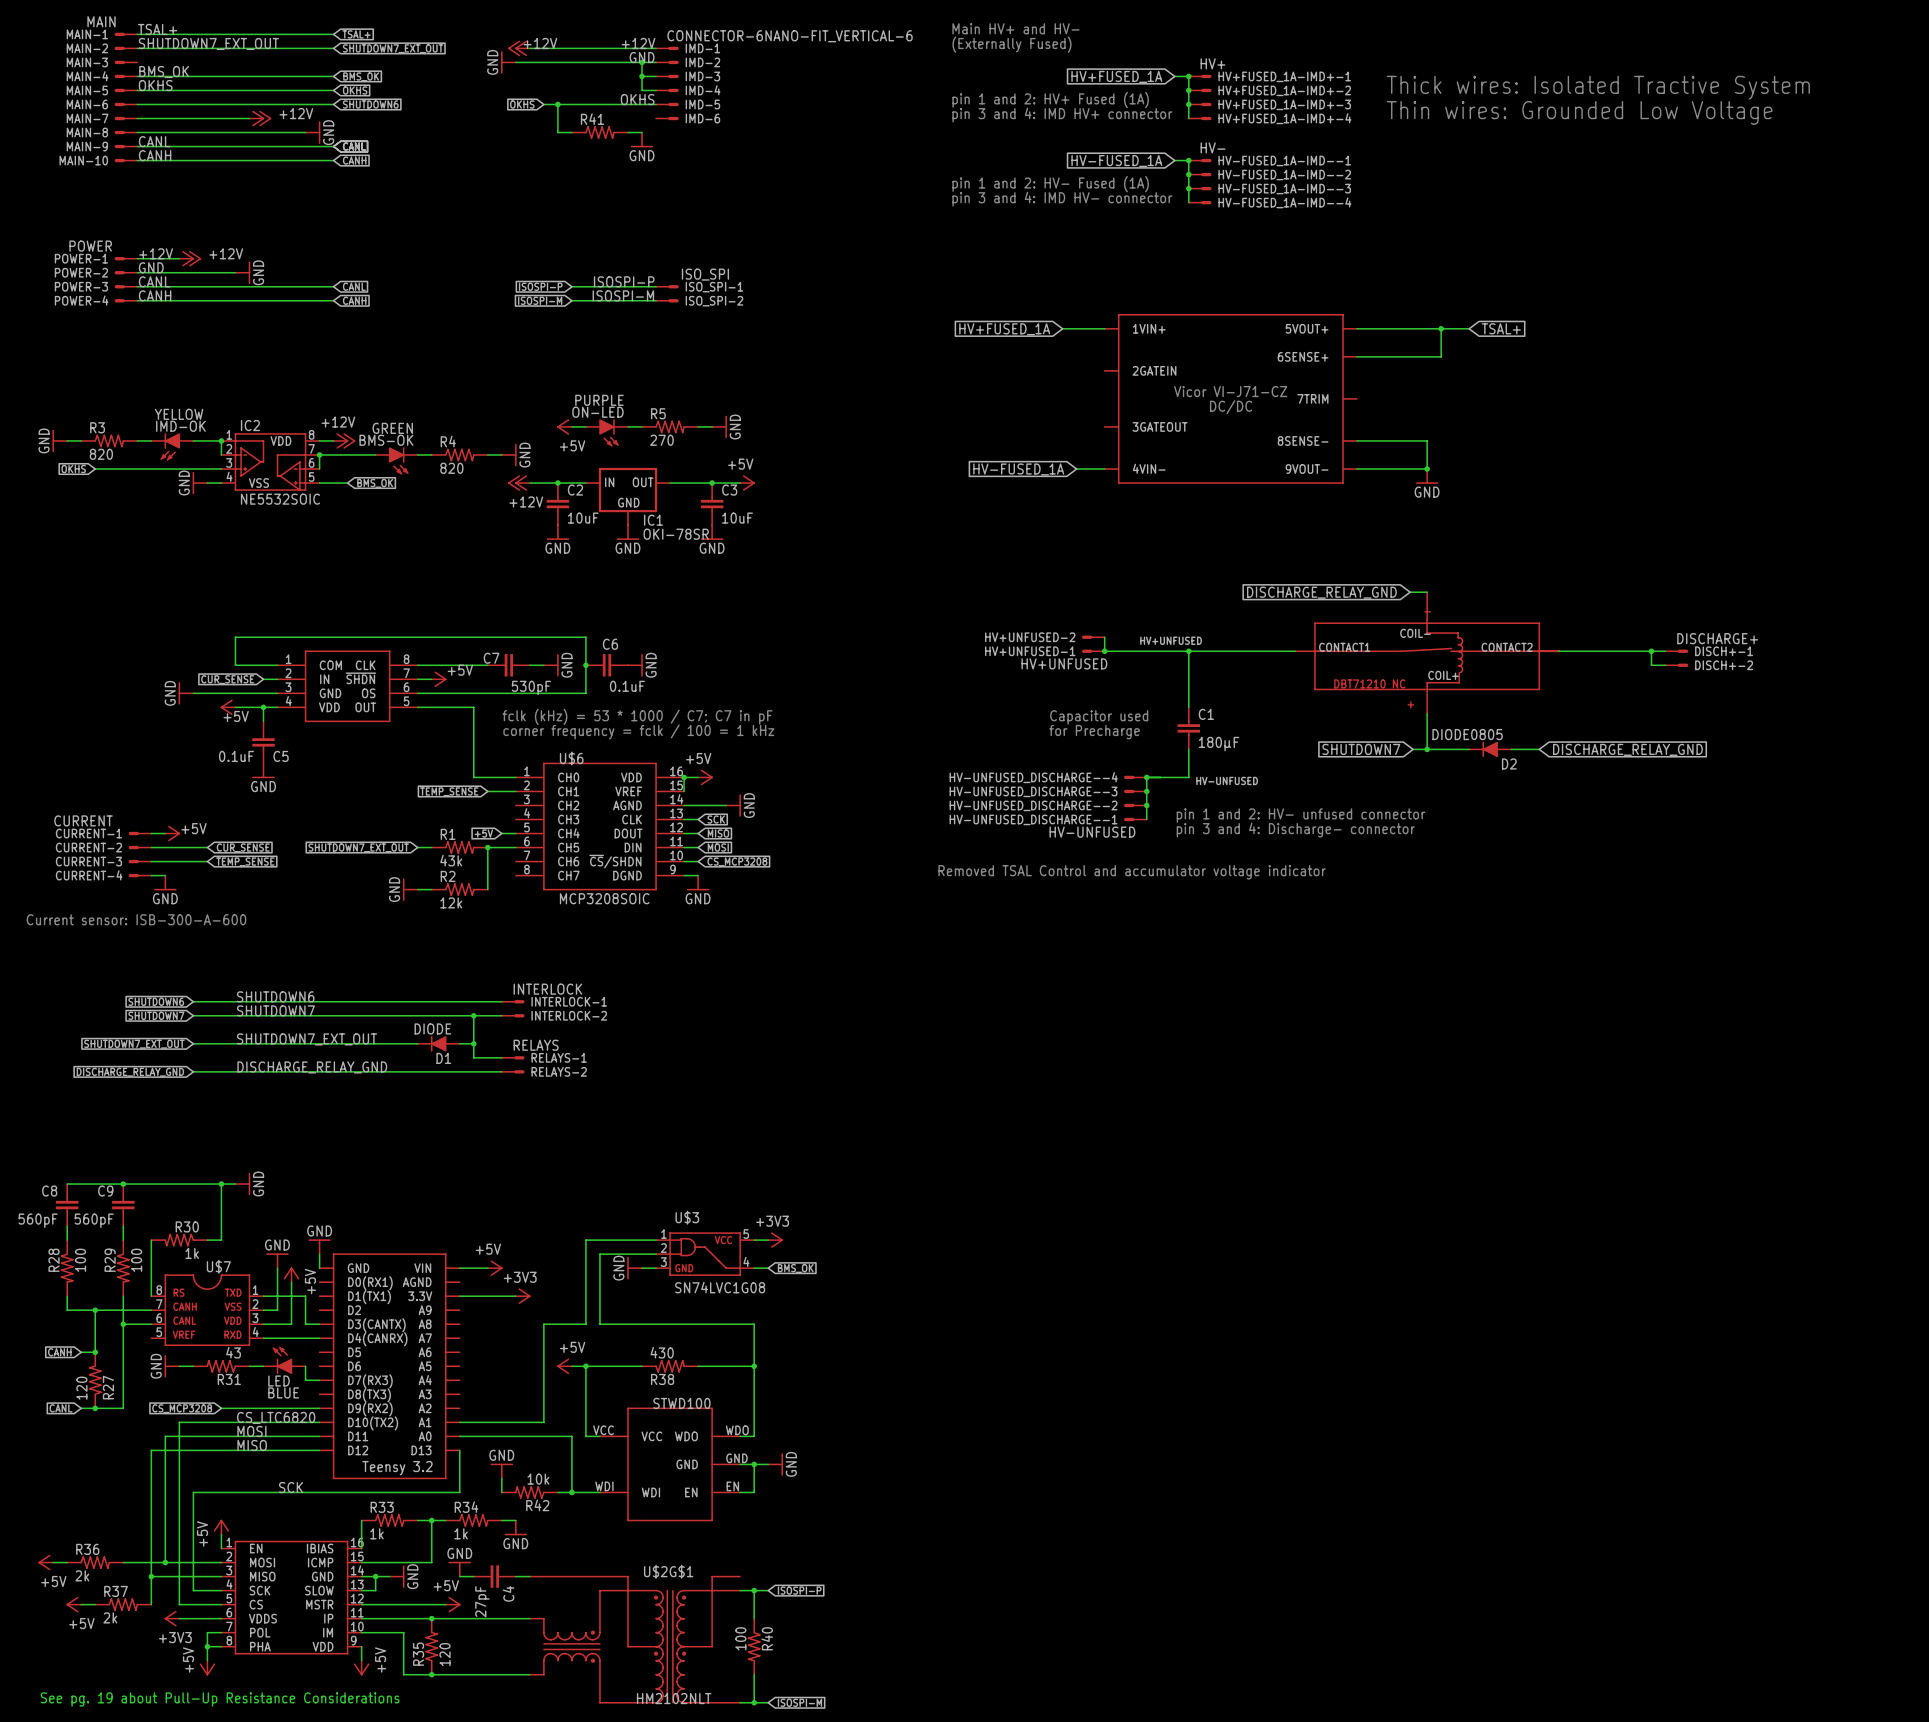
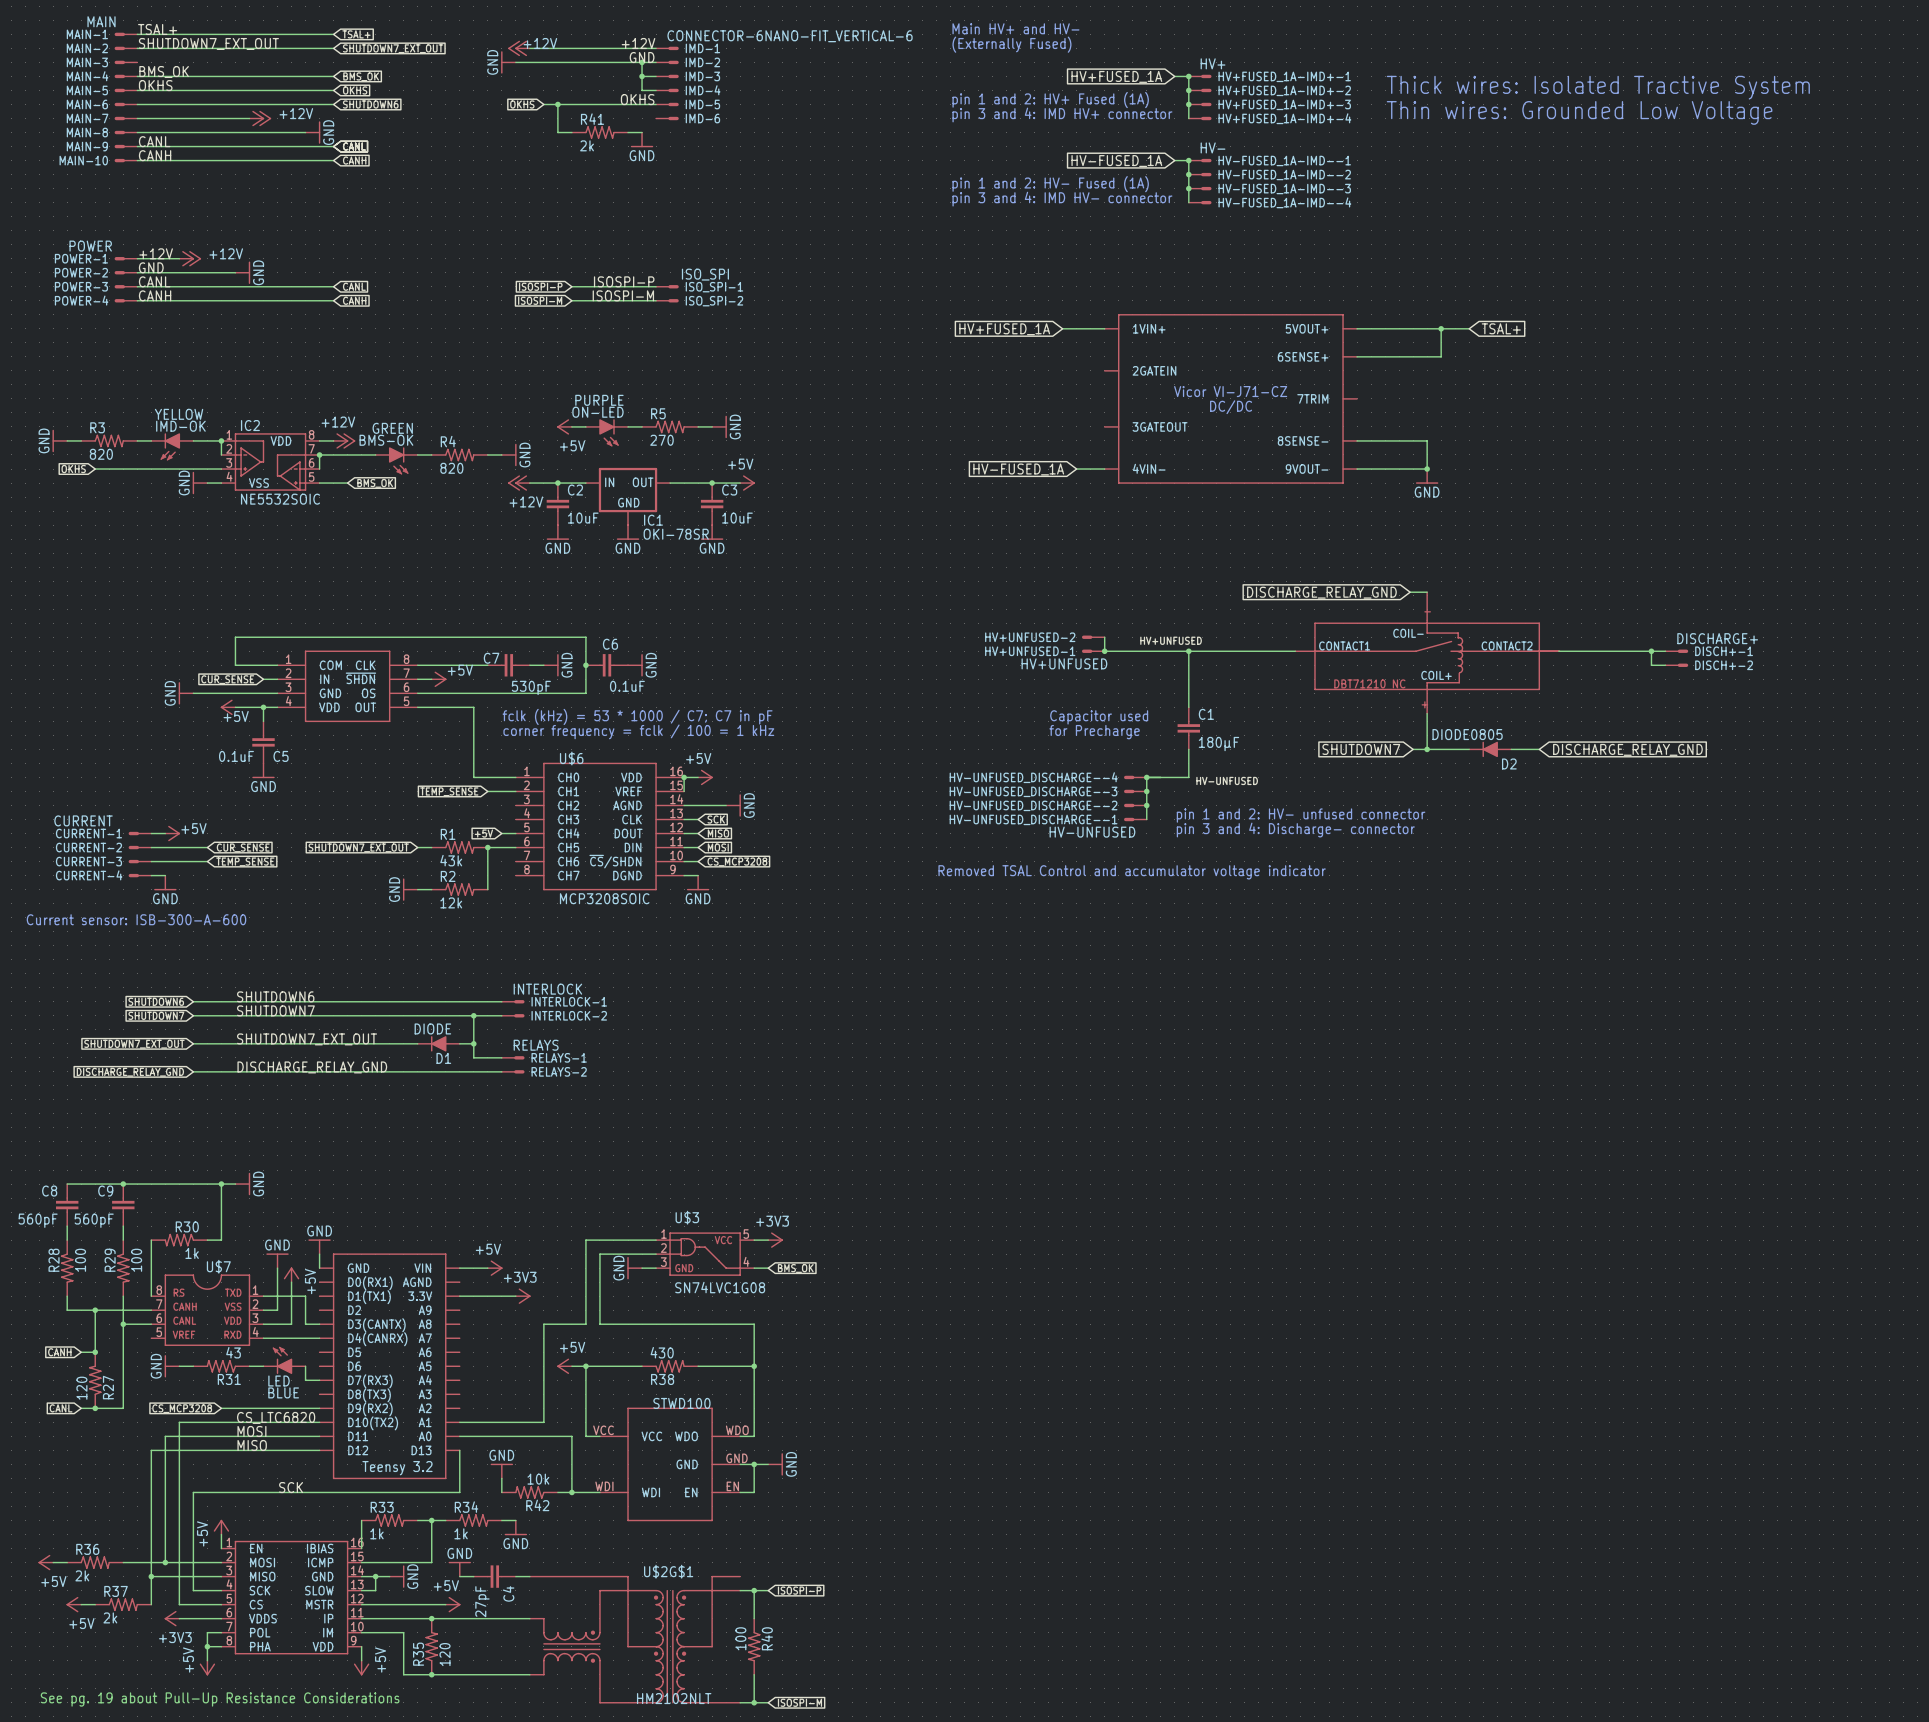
R41 value: none -> 2k (587, 145)
part symbol: [1295, 592, 1561, 714] -> [1295, 592, 1561, 714]

